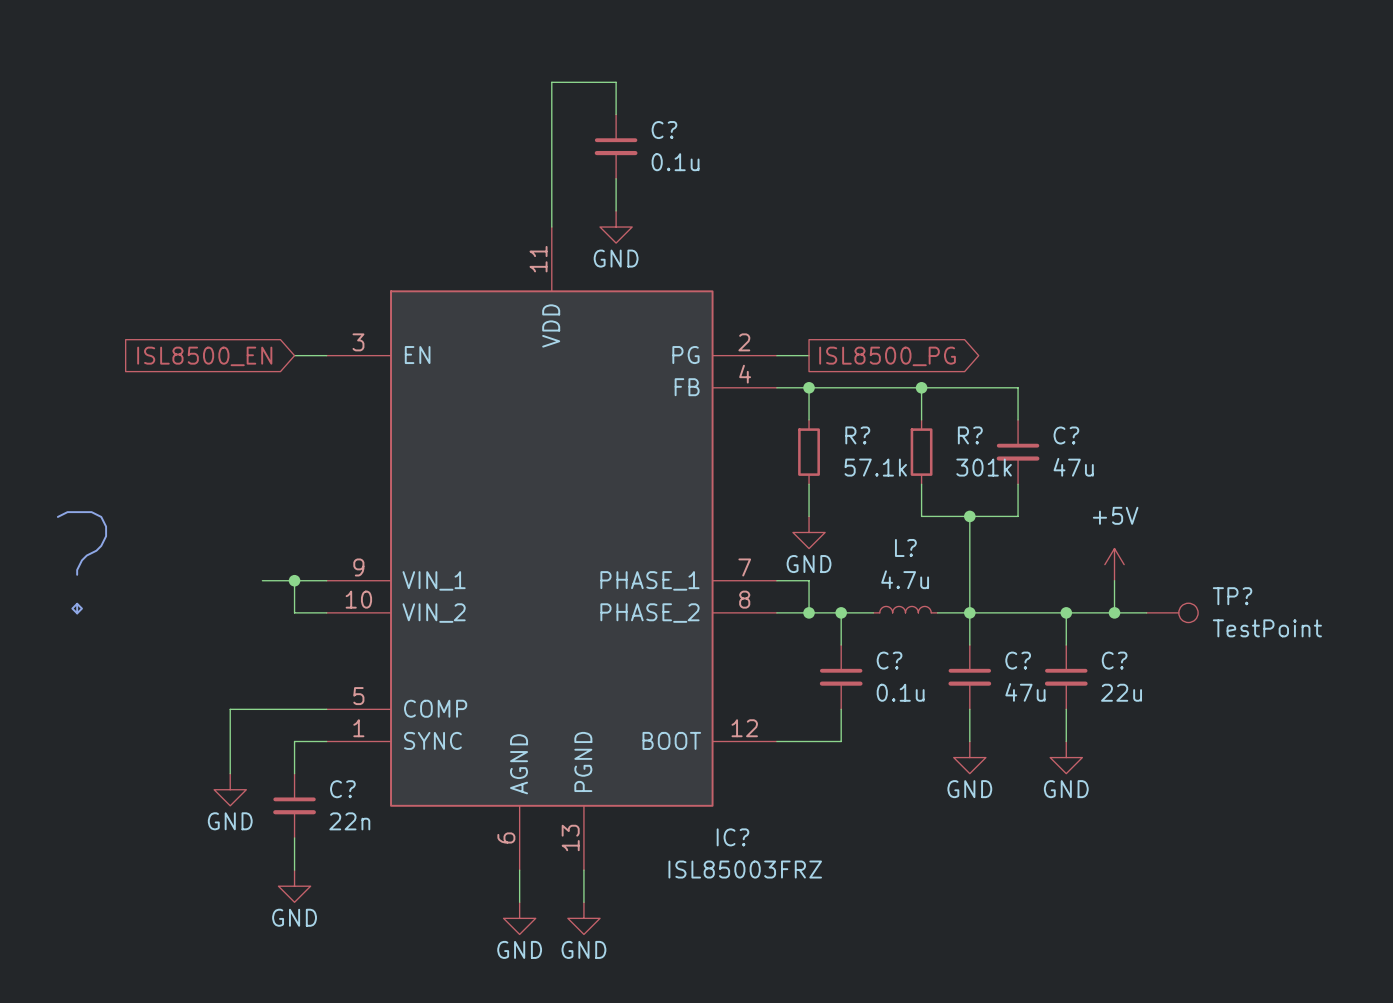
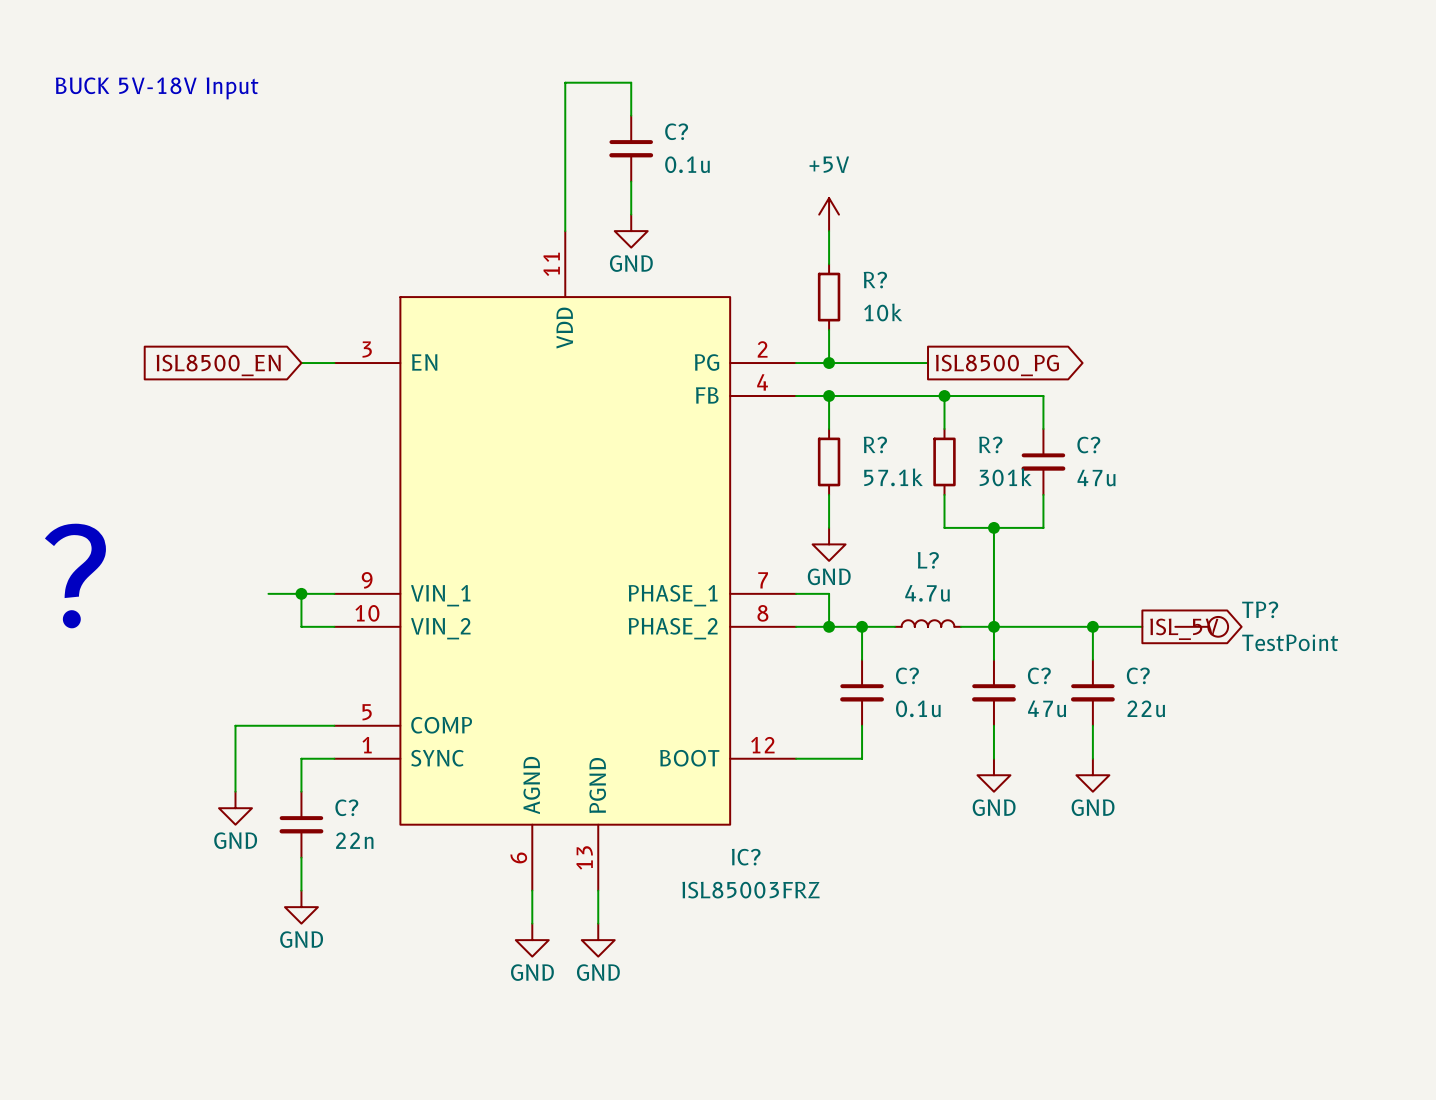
text: none -> BUCK 5V-18V Input (157, 88)
power symbol: none -> +5V (829, 214)
wire: none -> (829, 231) (829, 264)
R?: none -> 10k (829, 297)
wire: none -> (829, 330) (829, 363) (928, 363)
junction: none -> (829, 363)
global label position: ISL8500_PG (887, 356) -> ISL8500_PG (997, 365)
power symbol: +5V (1114, 564) -> none
wire: (1114, 580) (1114, 612) (1146, 612) -> none
junction: (1114, 612) -> none
global label: none -> ISL_5V (1184, 629)

